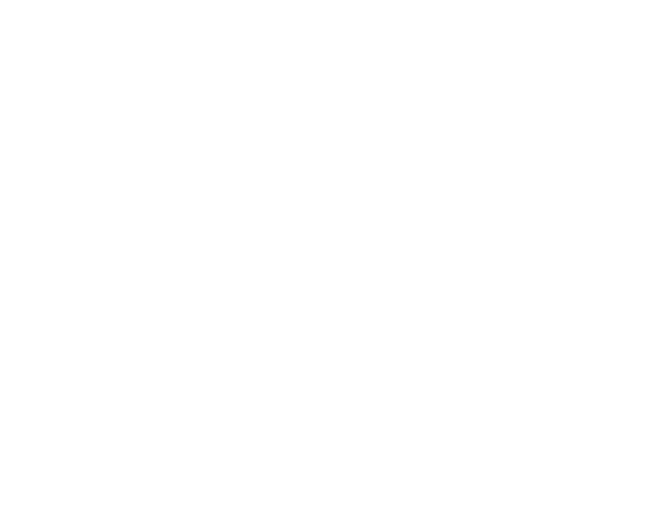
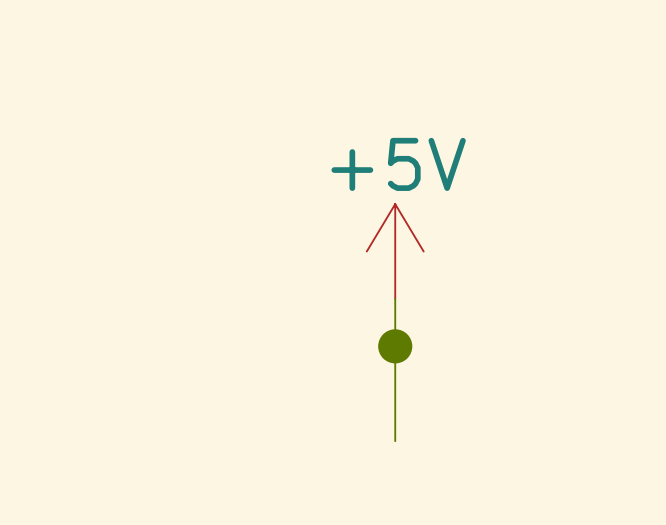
power symbol: none -> +5V (395, 251)
wire: none -> (395, 298) (395, 441)
junction: none -> (395, 346)

